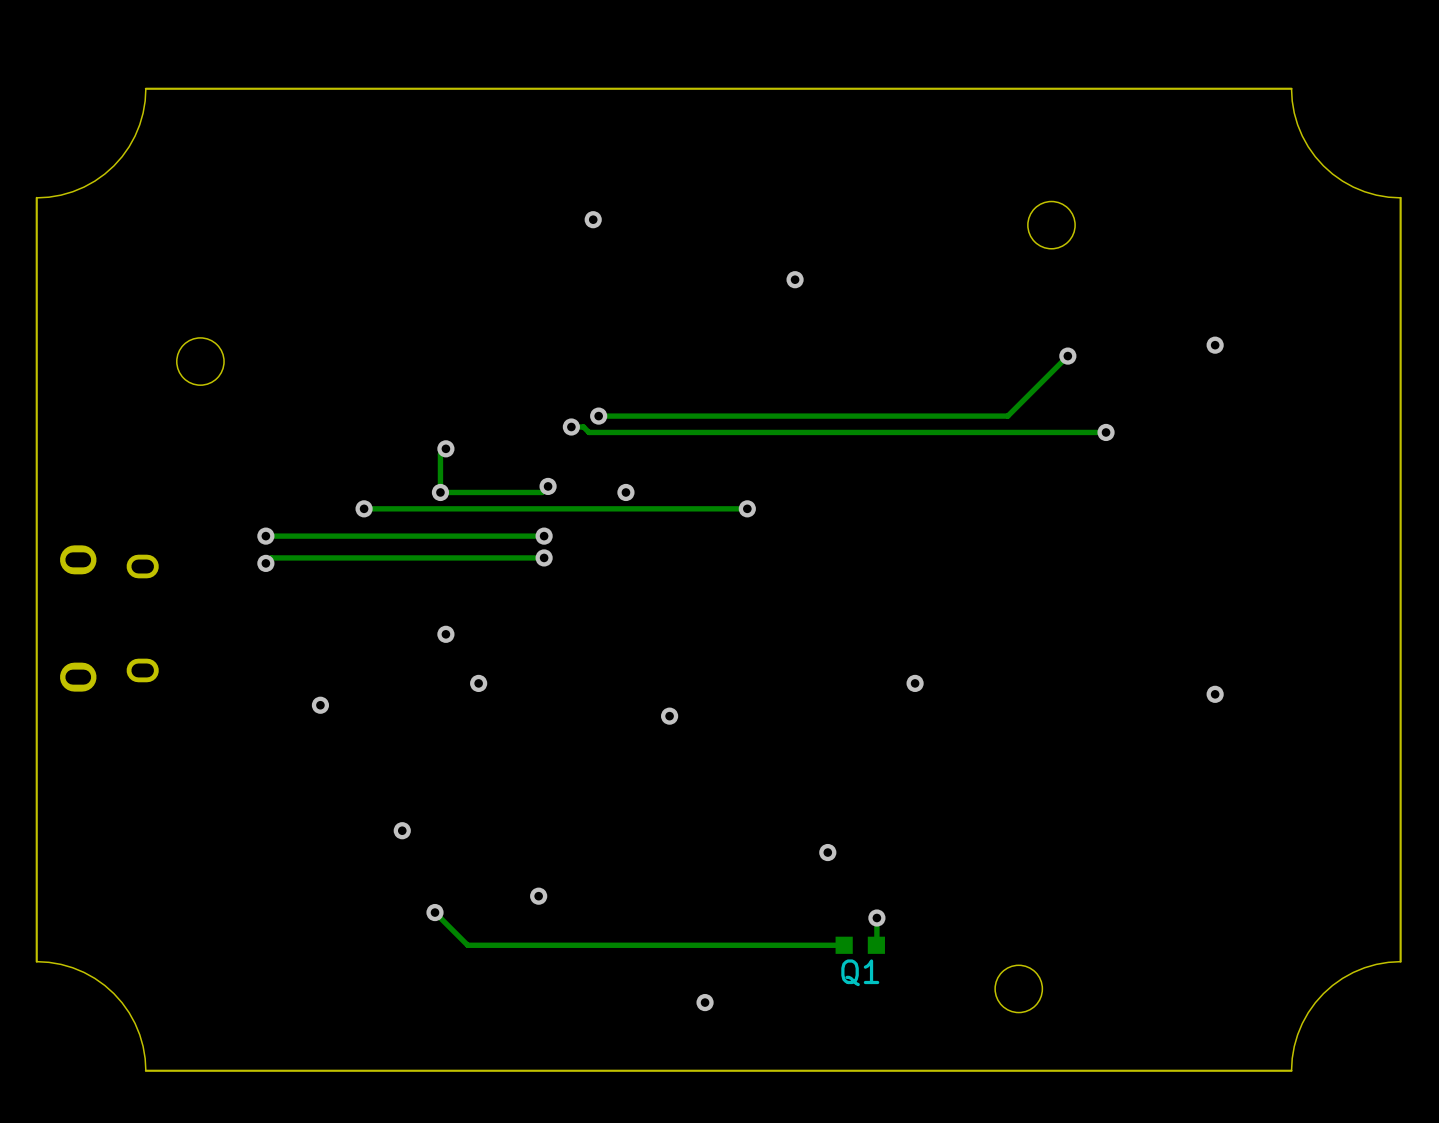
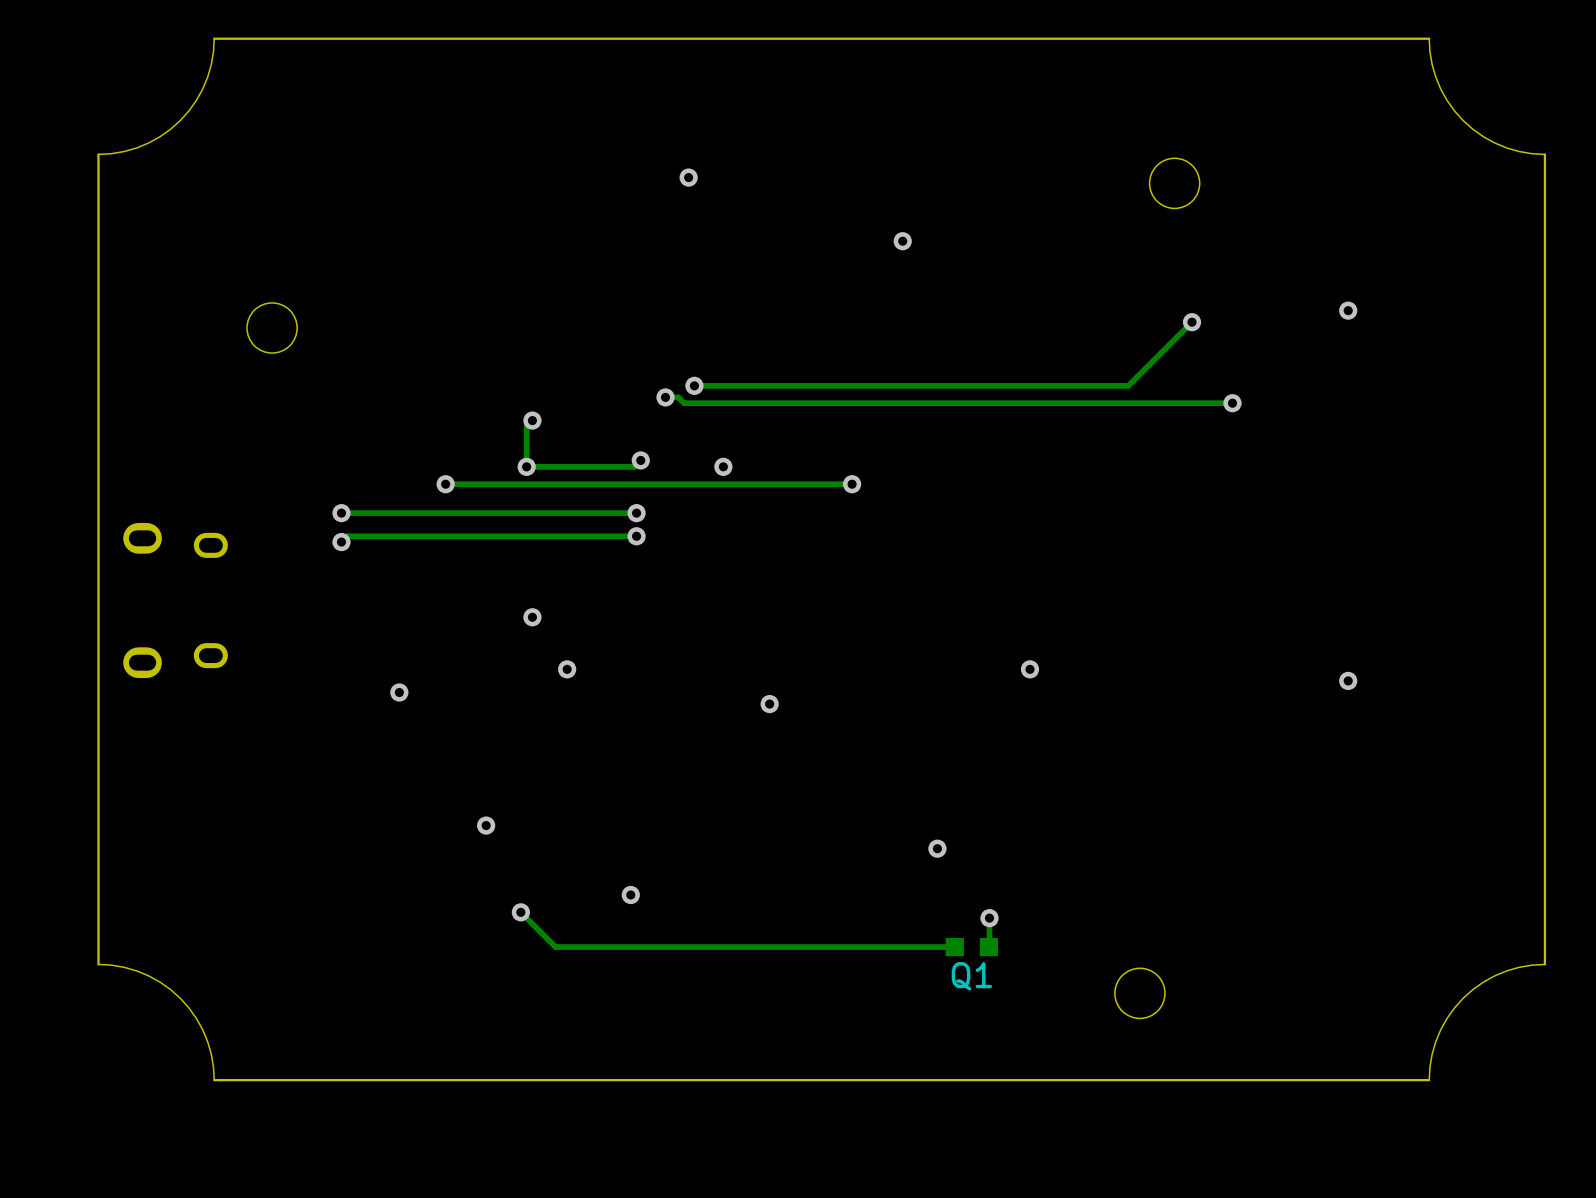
via: (705, 1002) -> none

